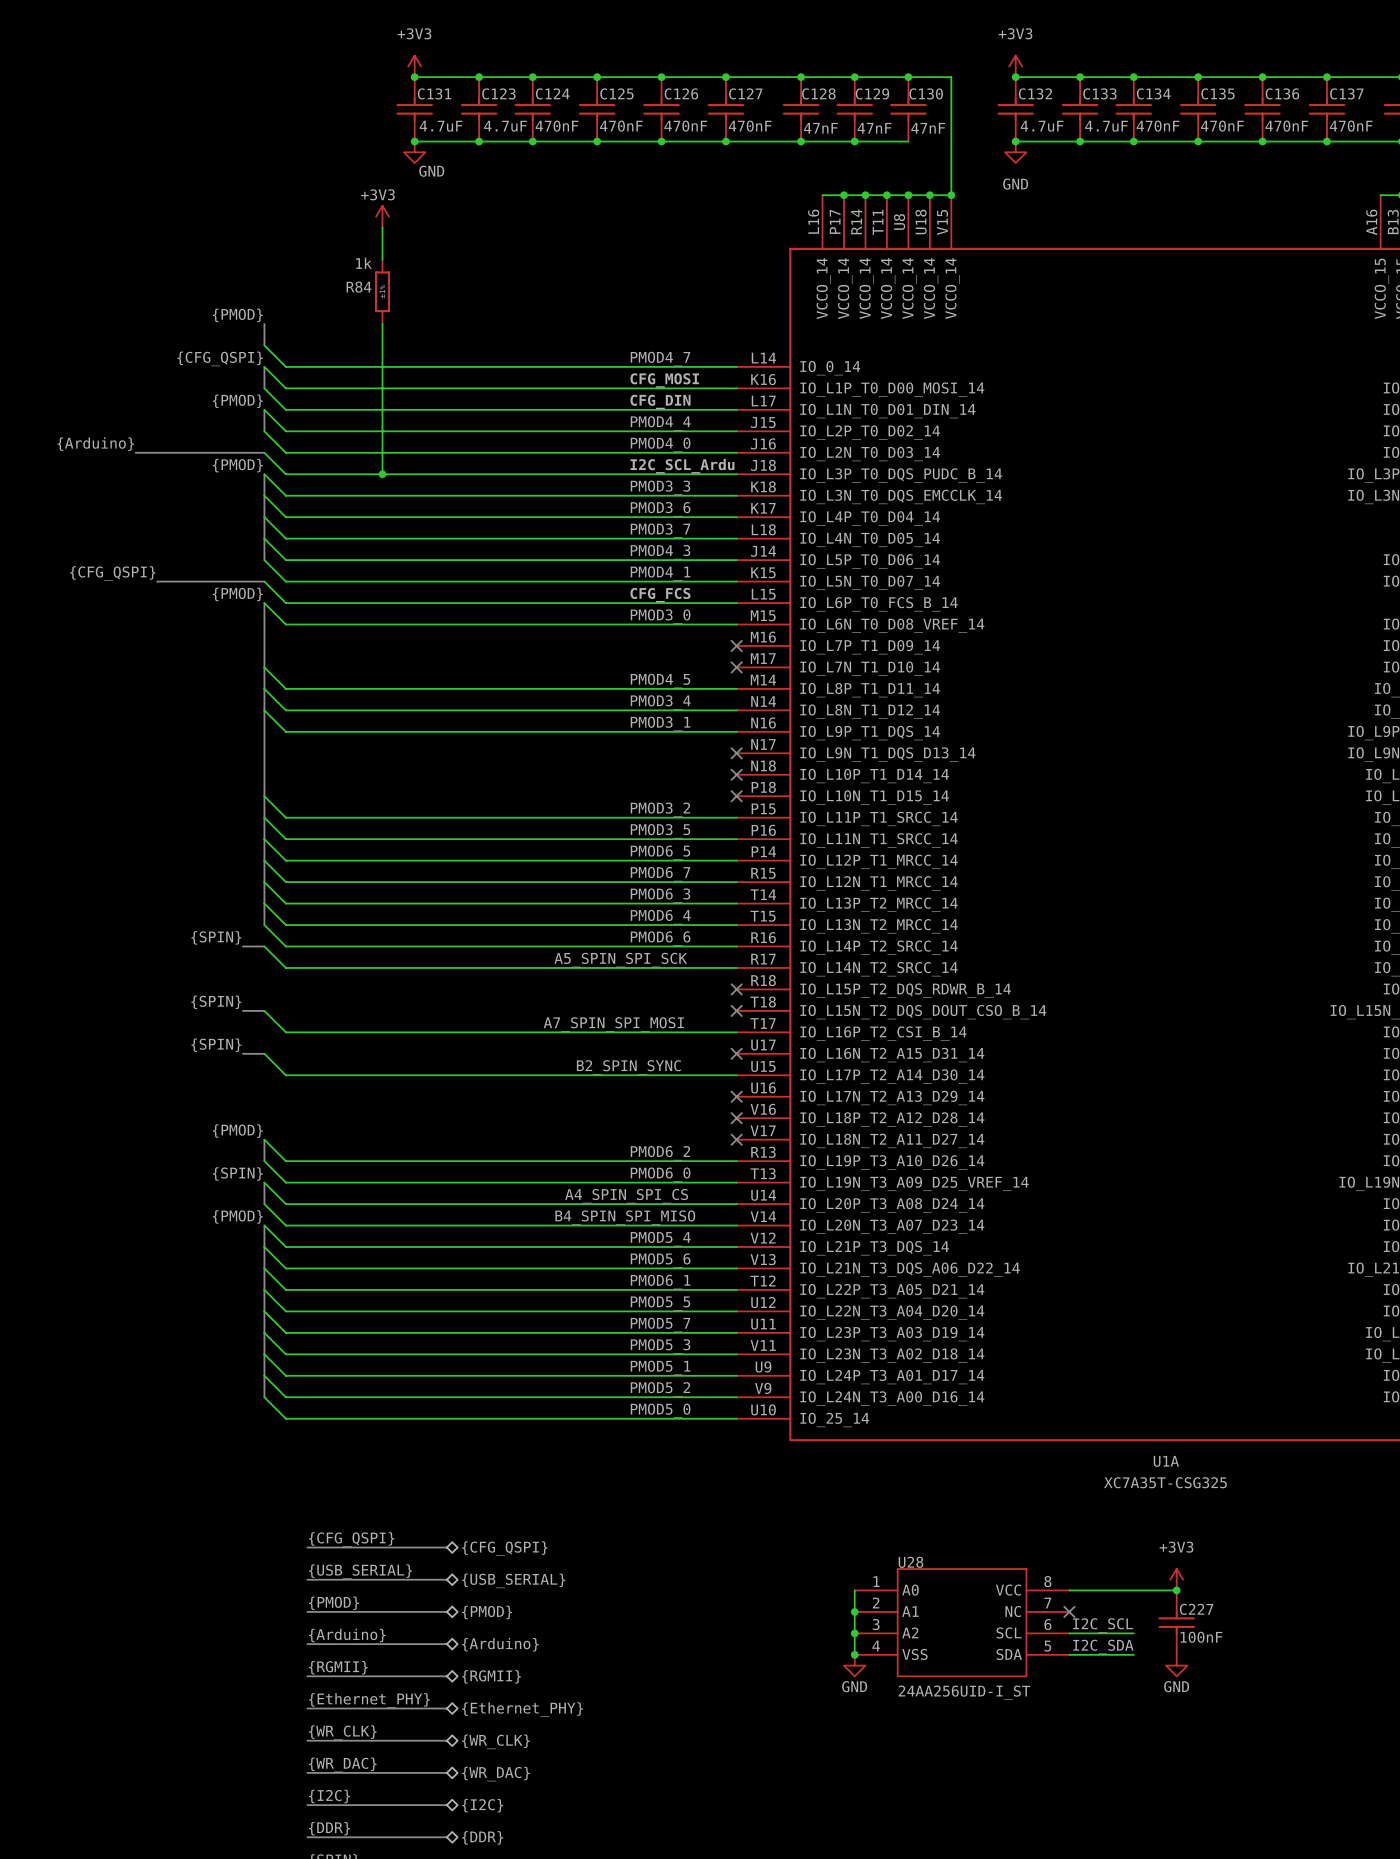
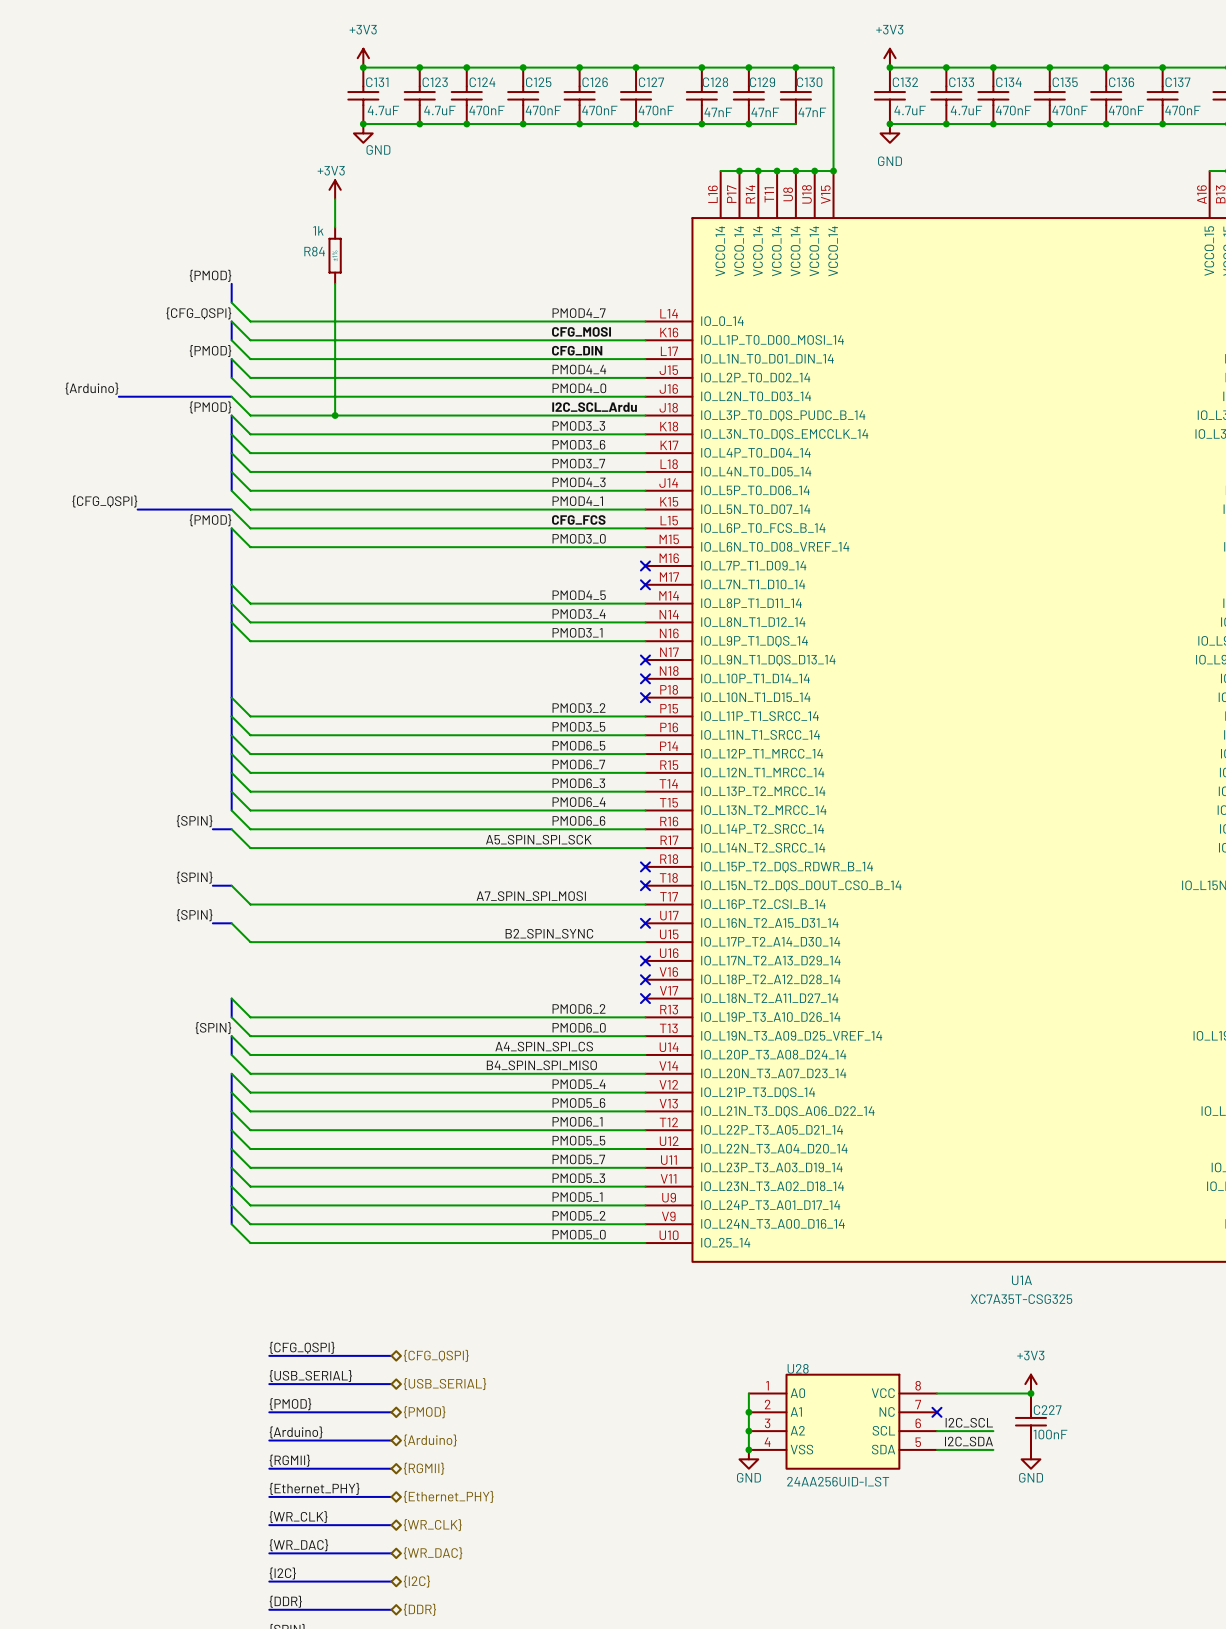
label: {PMOD} (237, 1131) -> none
label: {PMOD} (237, 1216) -> none

